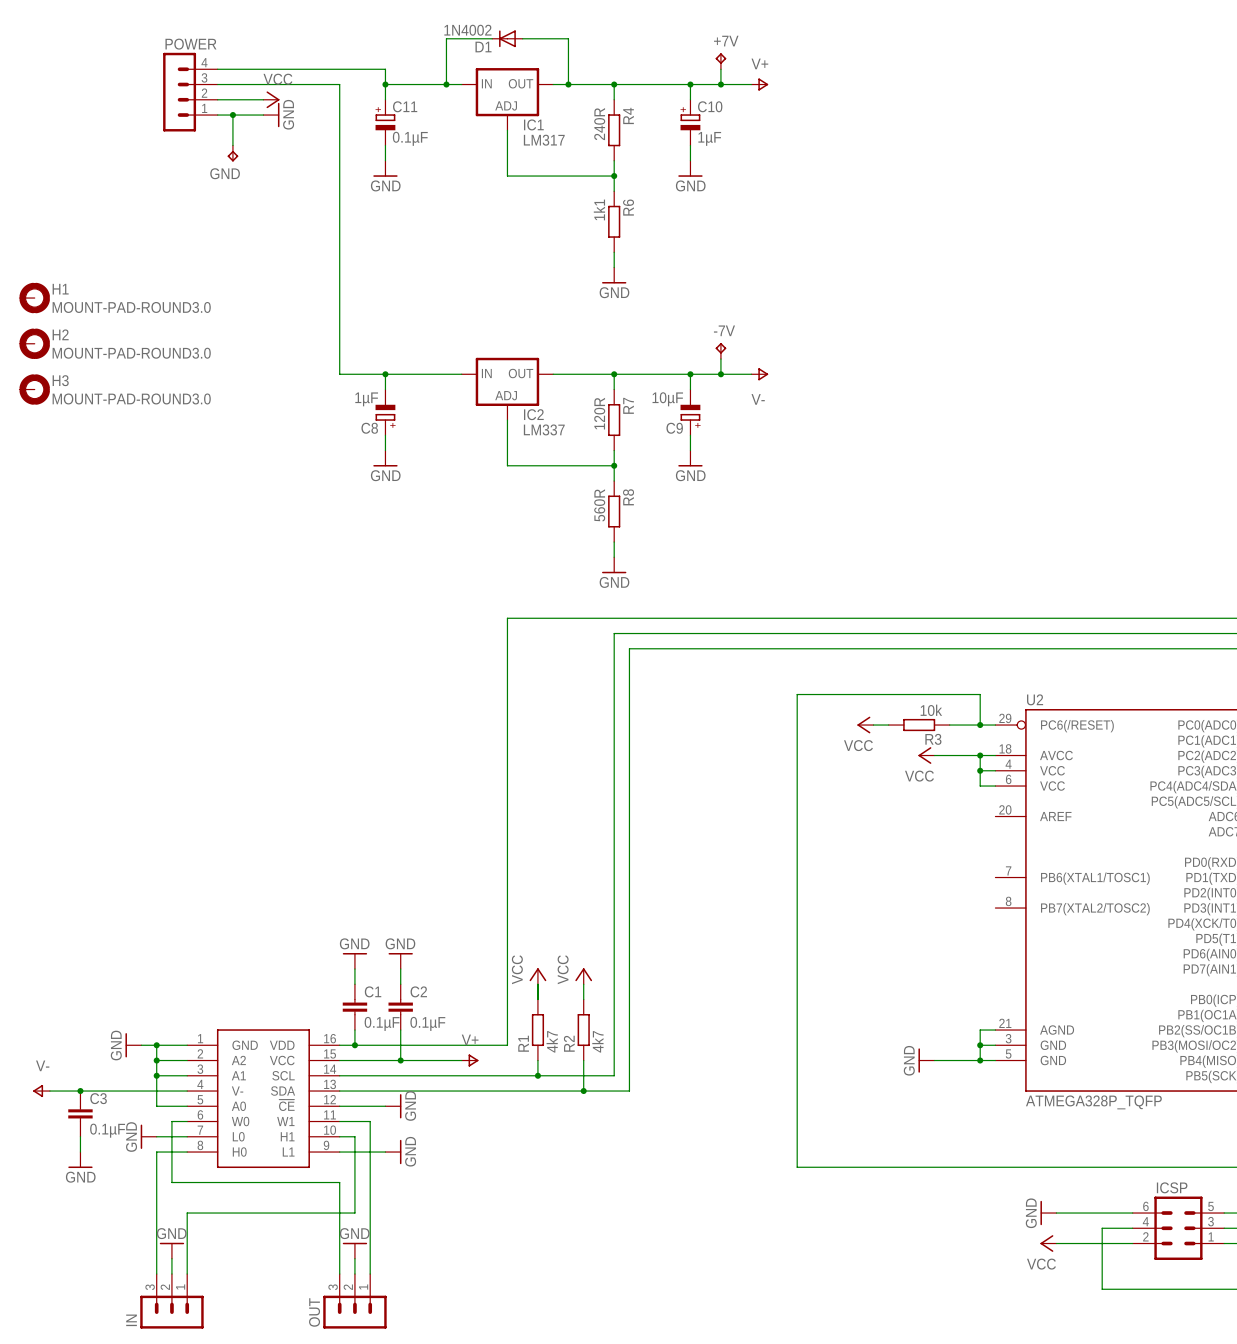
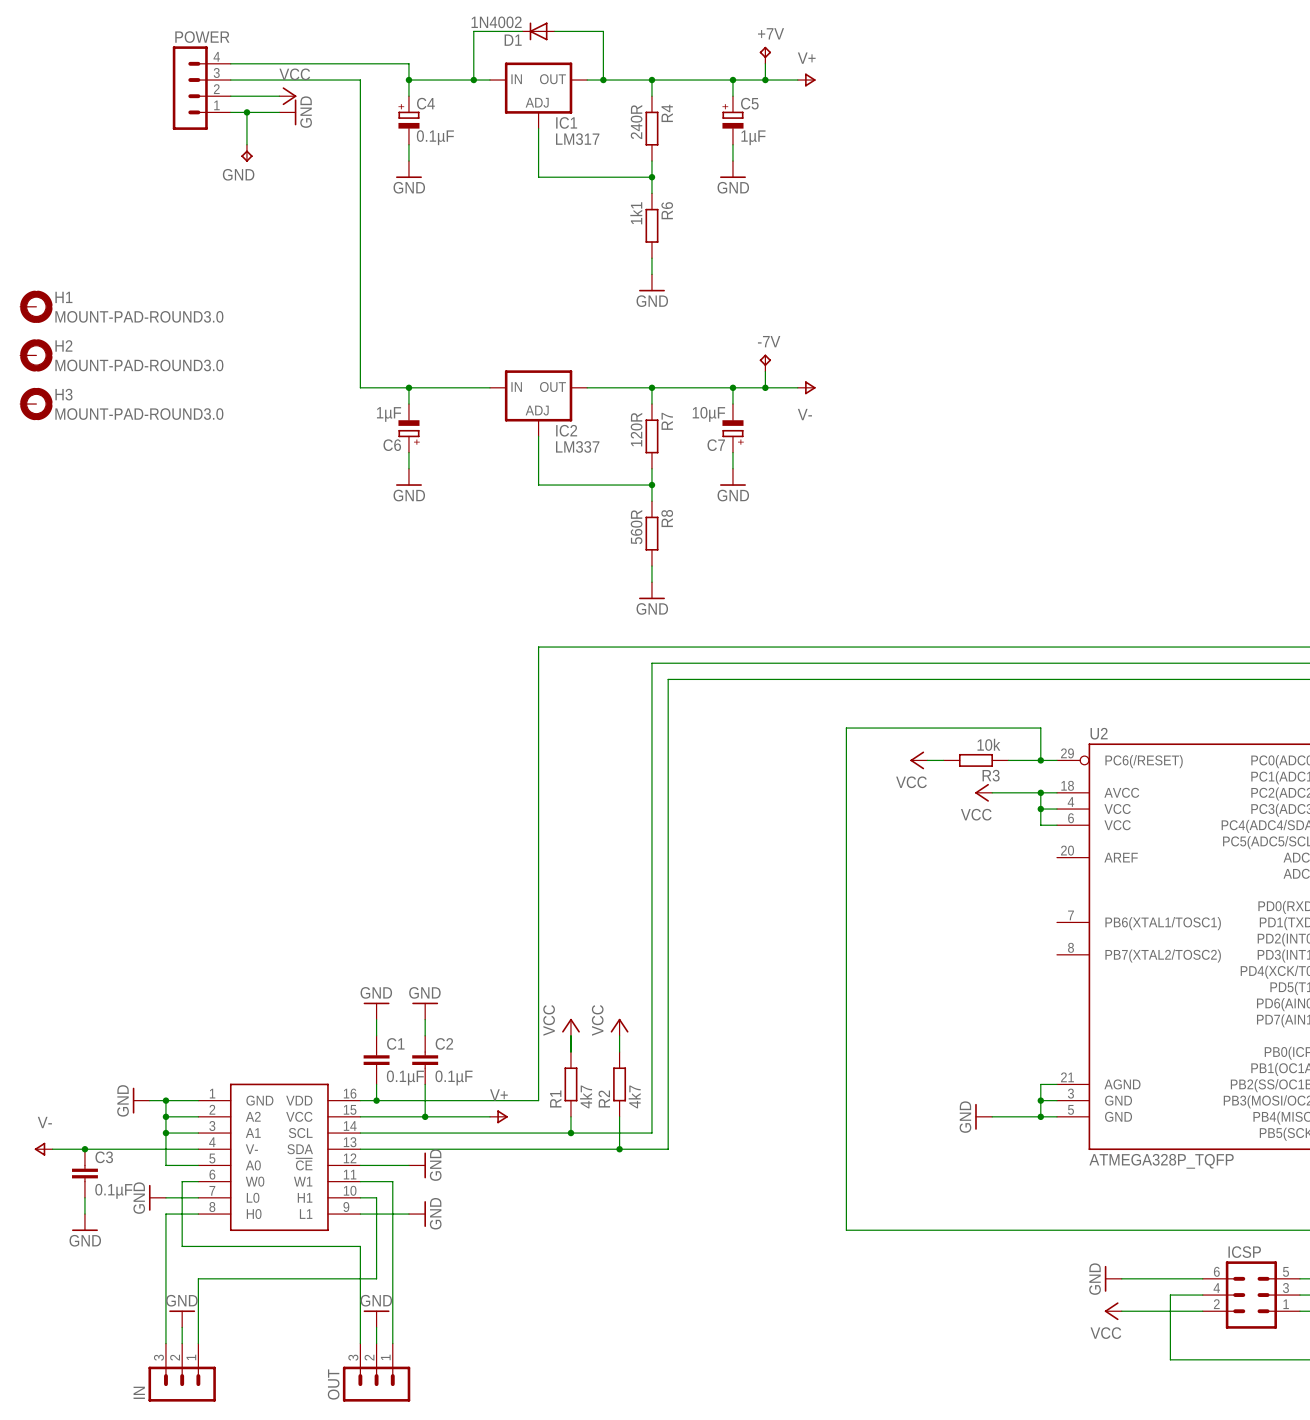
C11 name: C11 (405, 106) -> C4 (425, 103)
C10 name: C10 (710, 106) -> C5 (749, 103)
C8 name: C8 (369, 428) -> C6 (392, 445)
C9 name: C9 (674, 428) -> C7 (716, 445)

